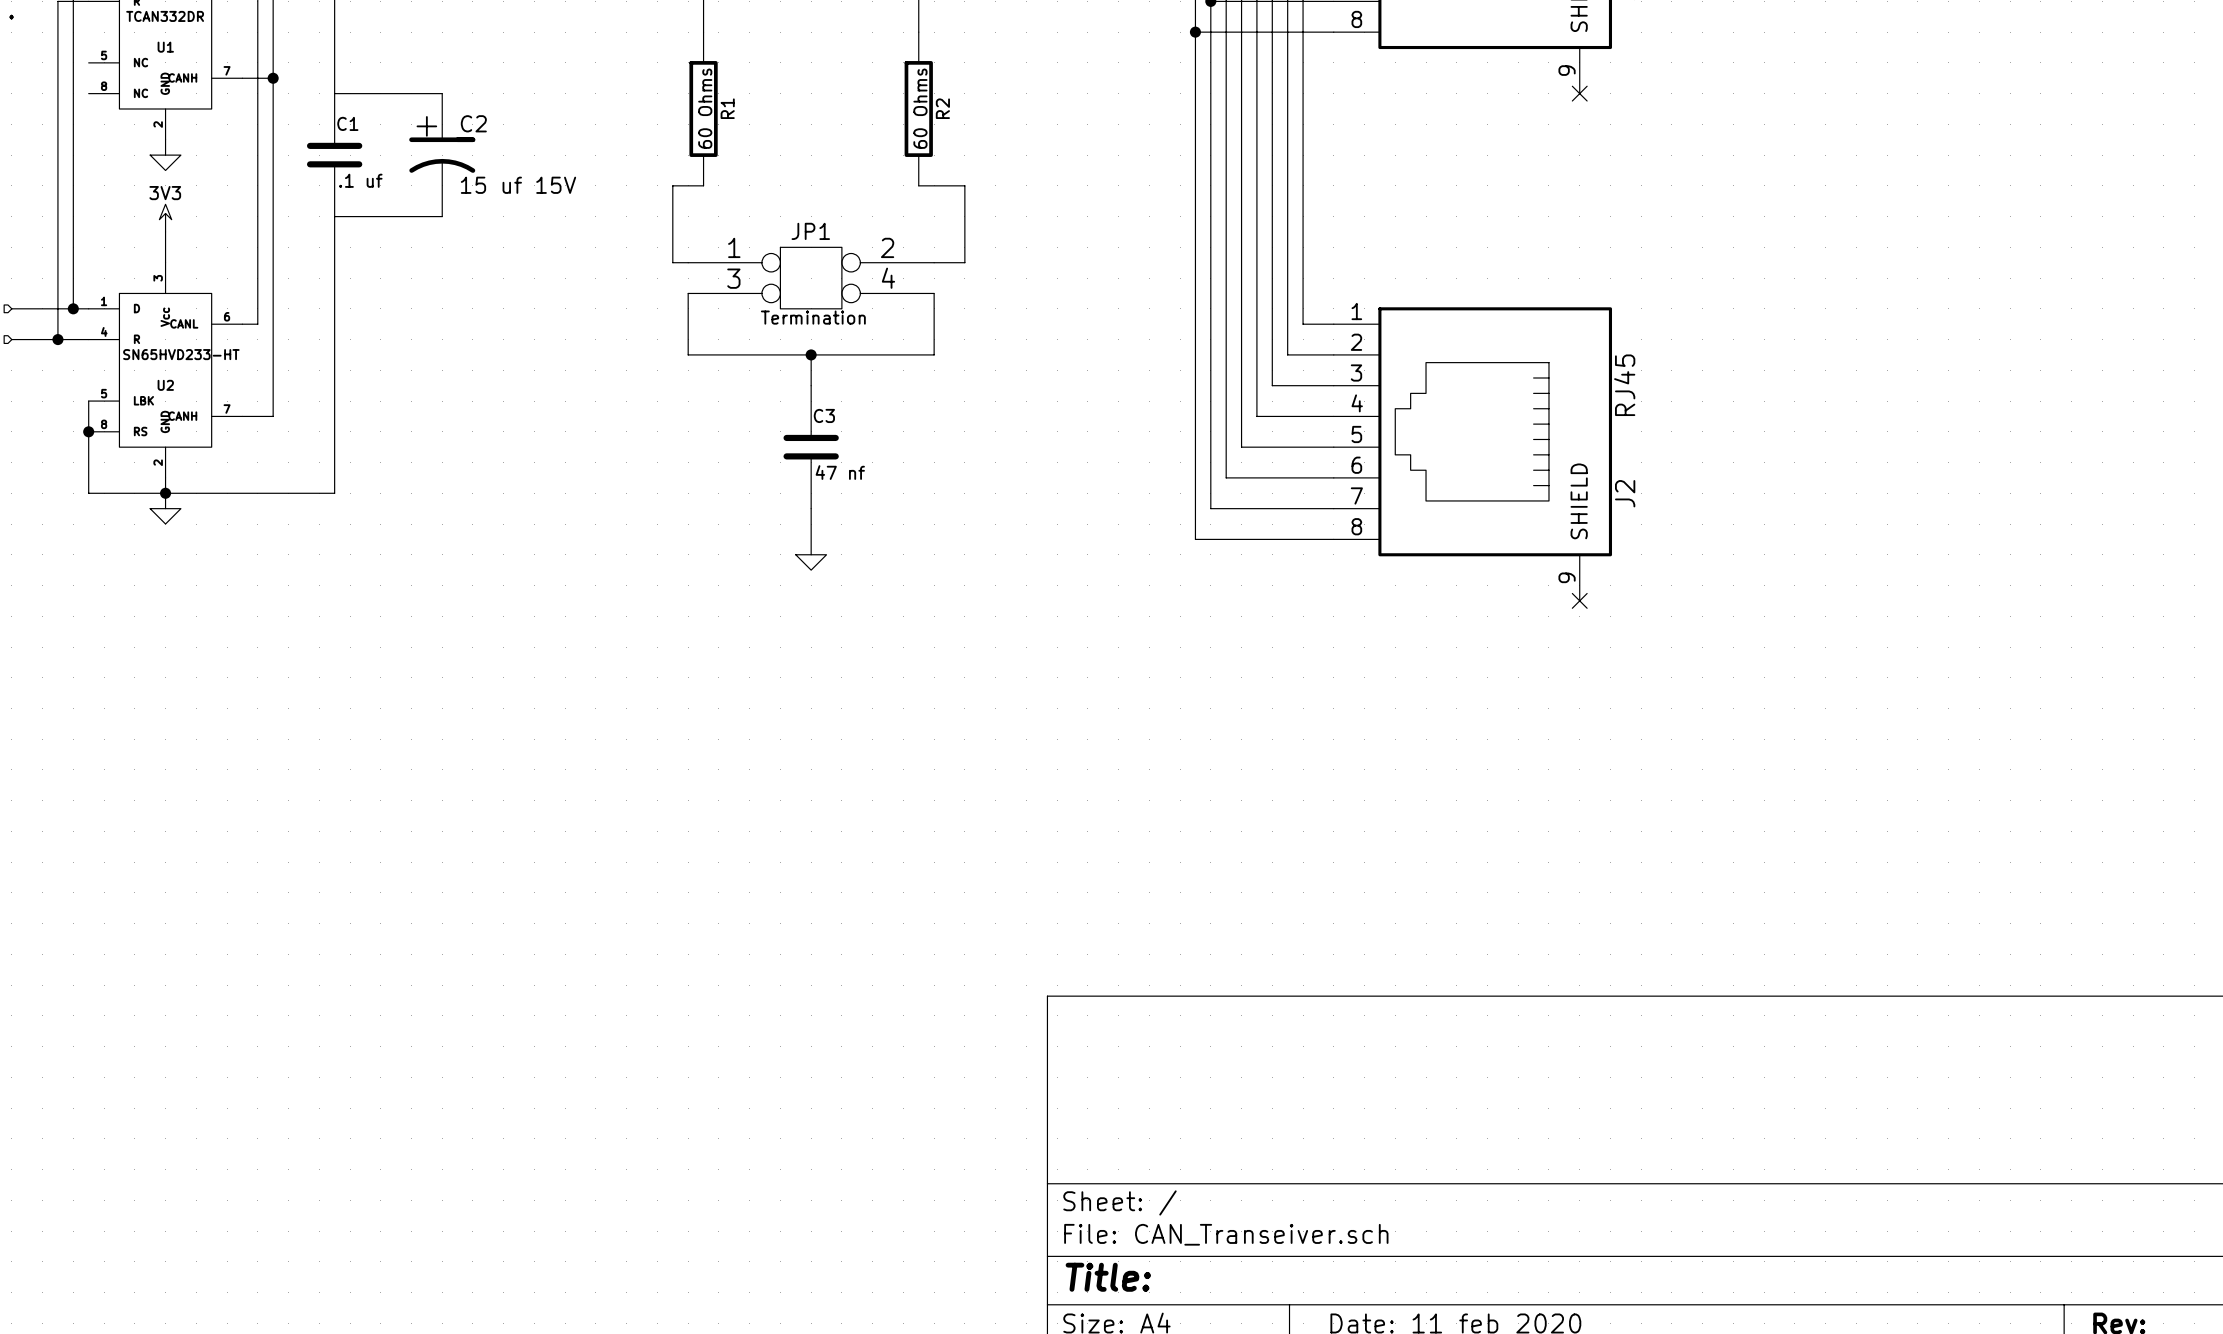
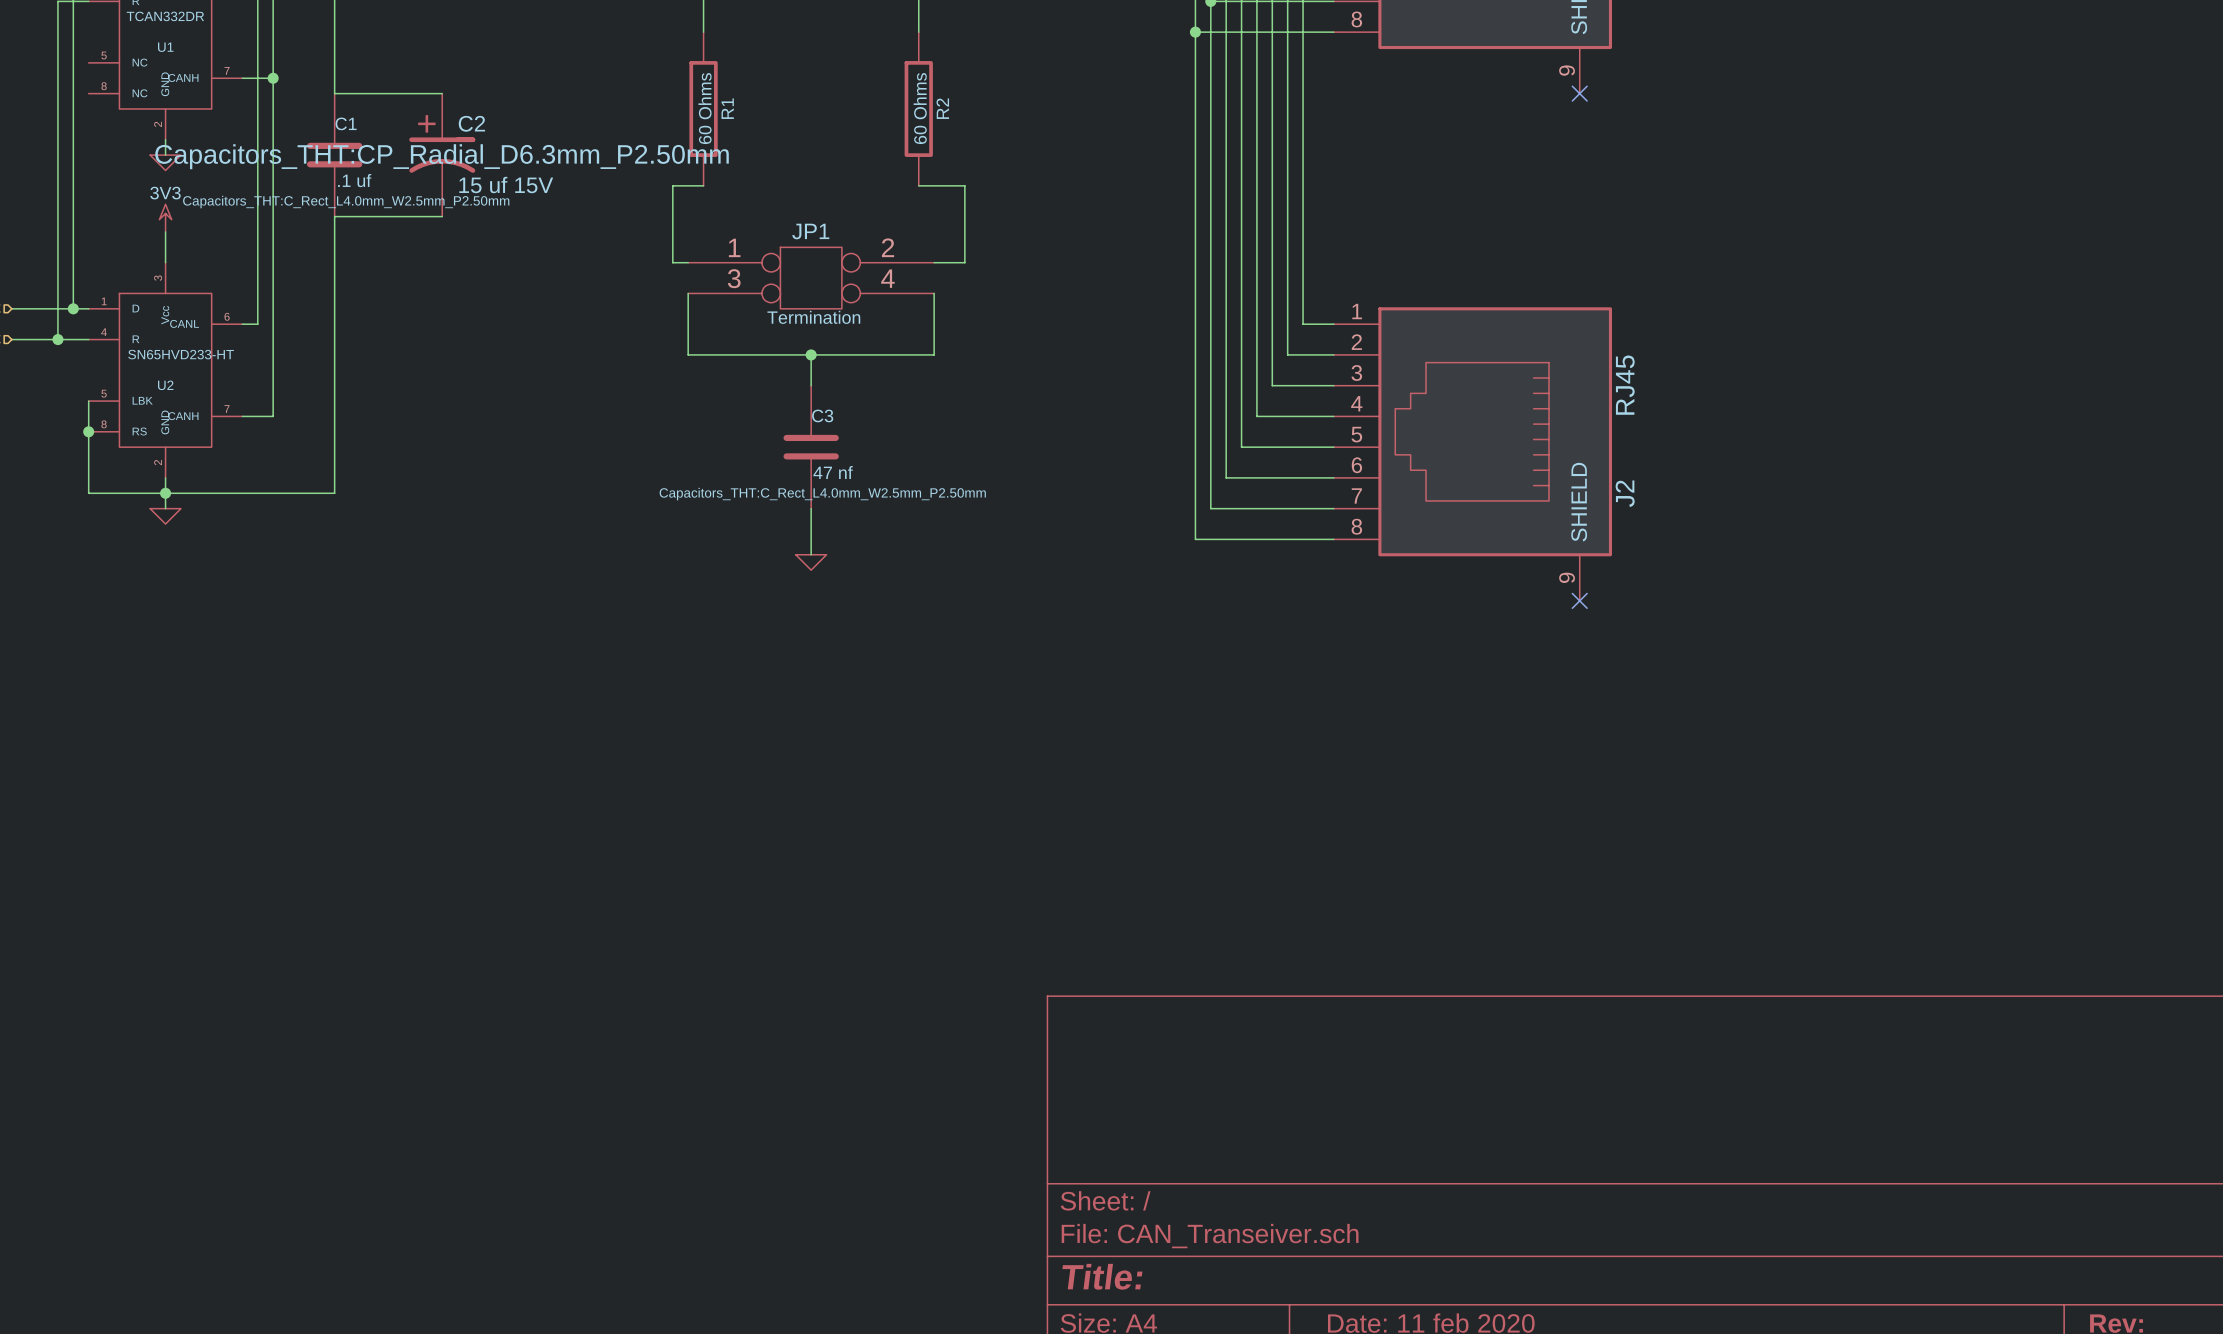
C2 text: none -> Capacitors_THT:CP_Radial_D6.3mm_P2.50mm (442, 156)
C1 text: none -> Capacitors_THT:C_Rect_L4.0mm_W2.5mm_P2.50mm (346, 202)
C3 text: none -> Capacitors_THT:C_Rect_L4.0mm_W2.5mm_P2.50mm (822, 494)

